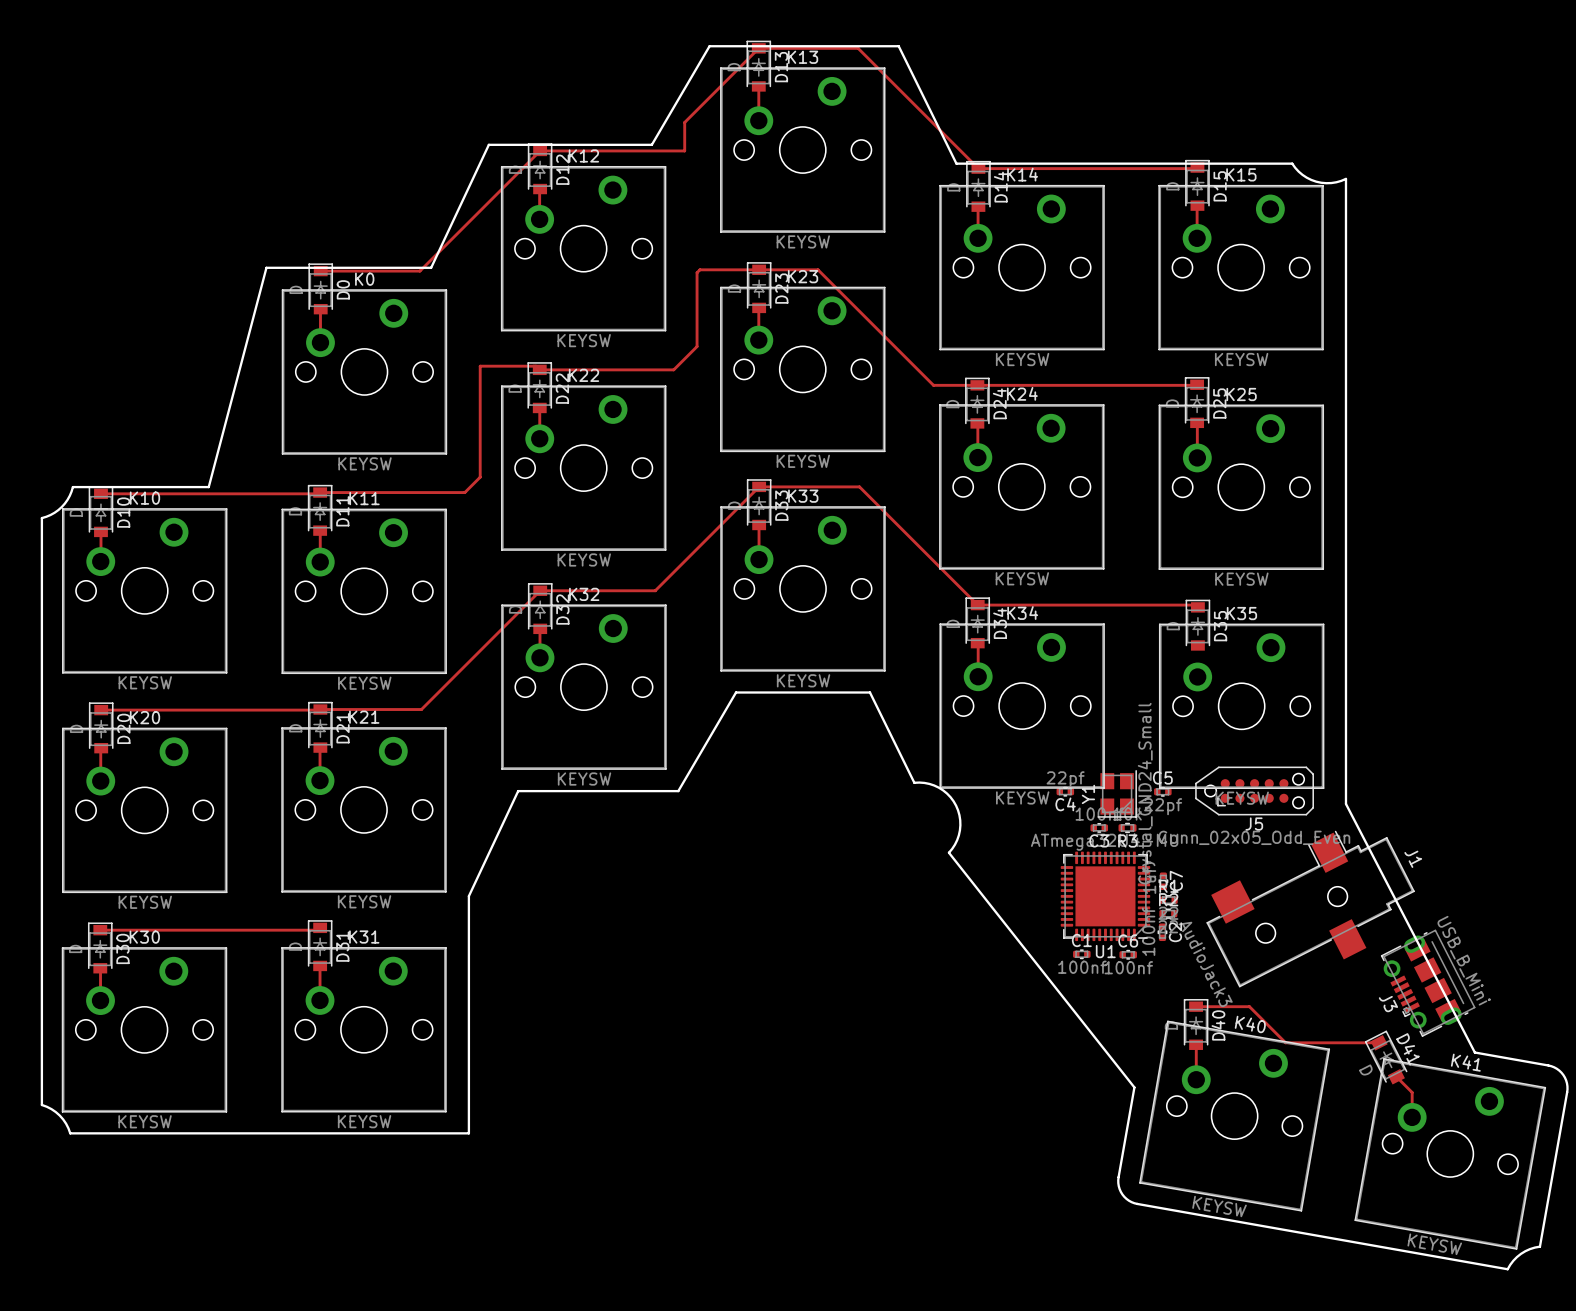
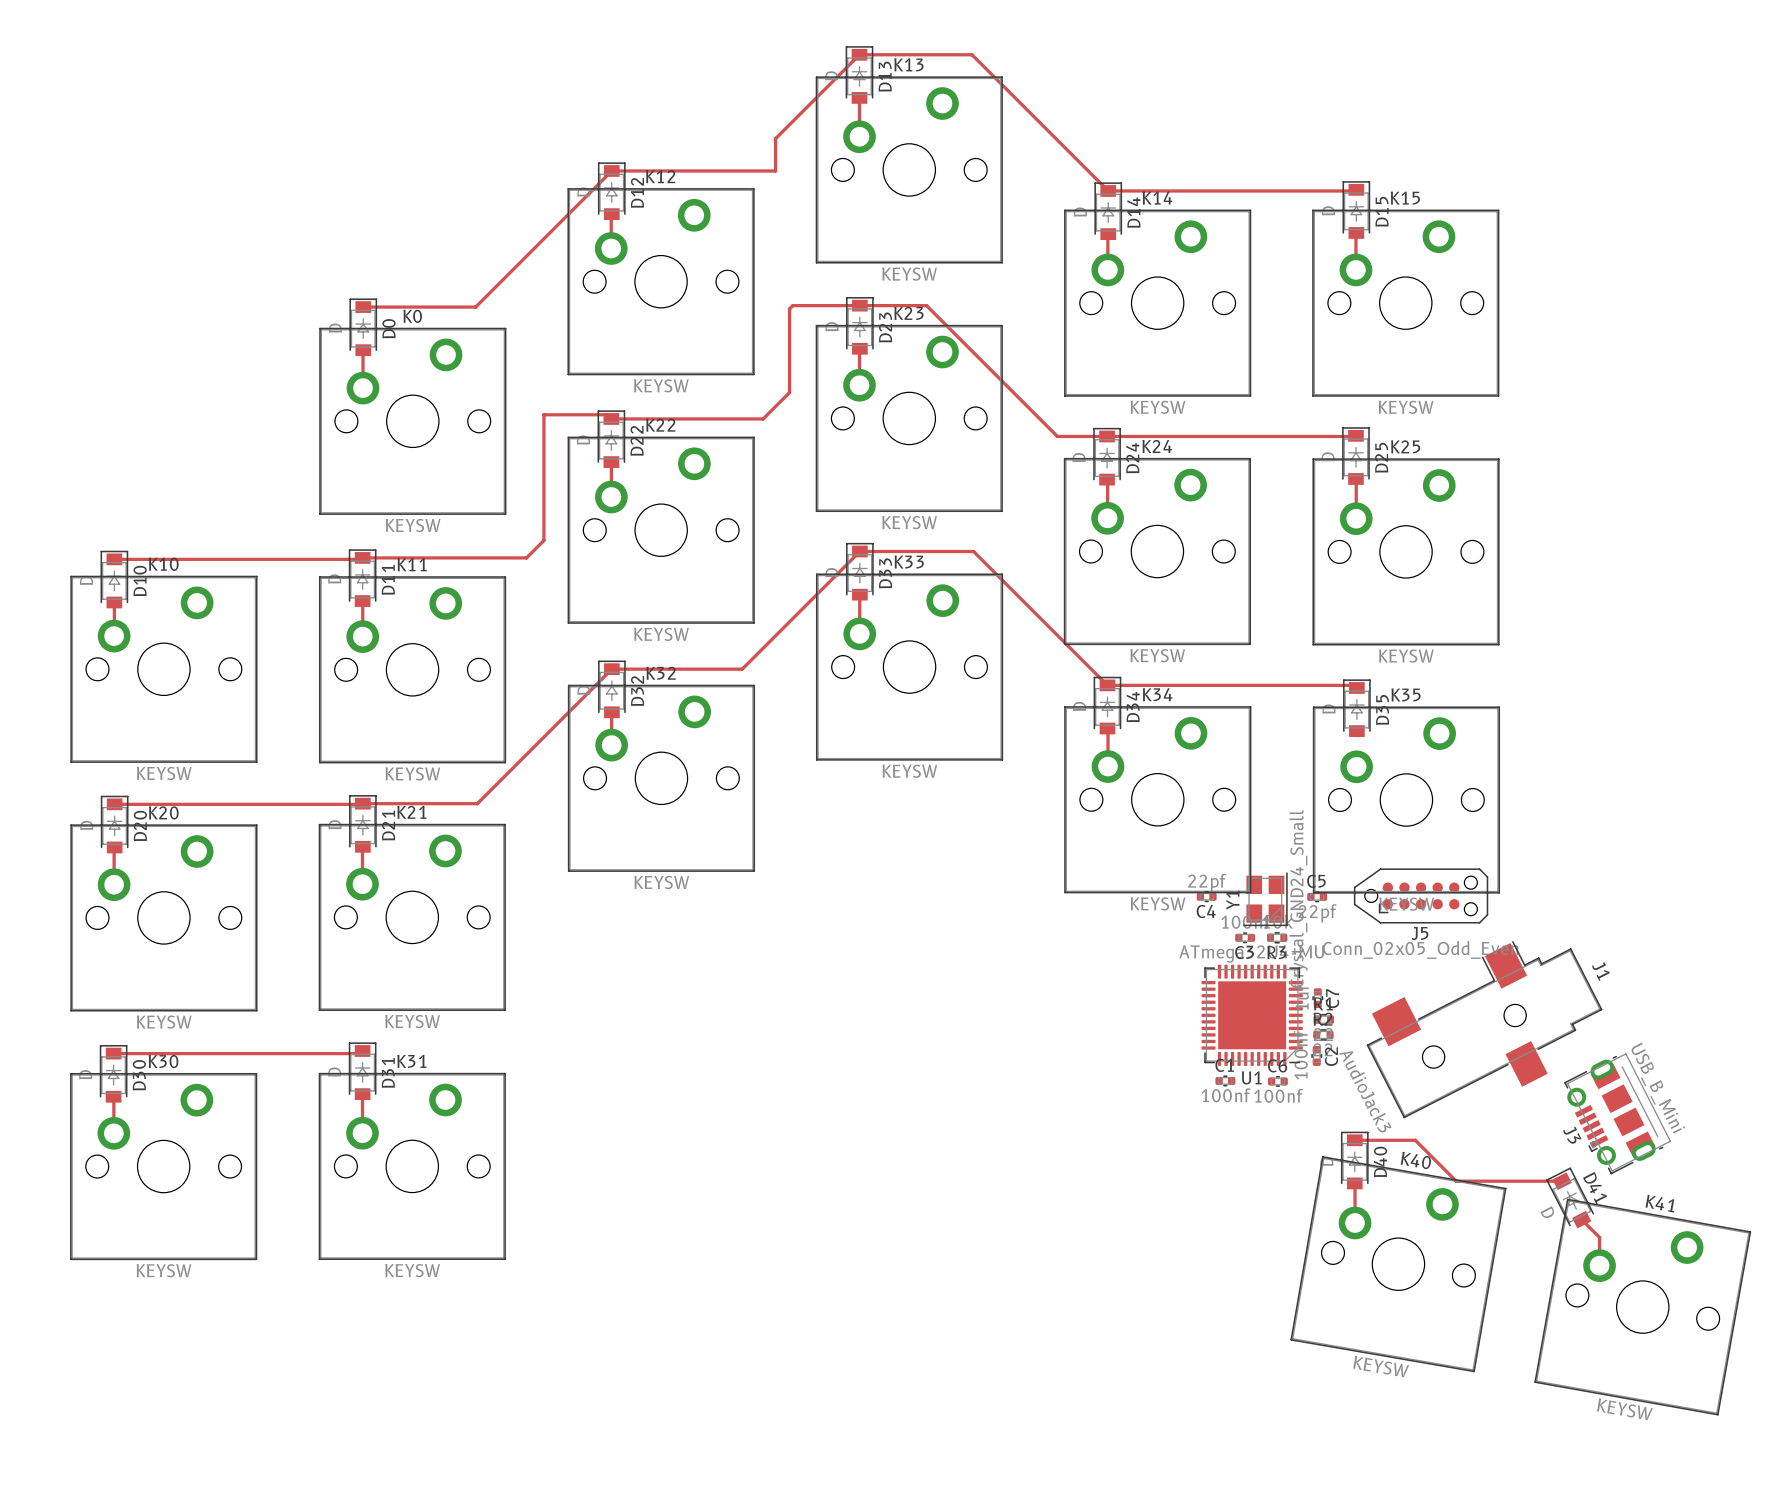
board edge: (709, 46) (651, 144) (488, 144) (431, 267) (266, 267) (208, 487) (72, 487) (67, 499) (61, 507) (54, 512) (41, 518) (41, 1104) (59, 1115) (70, 1133) (468, 1133) (468, 896) (518, 791) (678, 791) (736, 692) (869, 692) (914, 782) (929, 783) (938, 787) (950, 797) (956, 805) (959, 815) (959, 830) (954, 844) (948, 852) (1134, 1087) (1118, 1180) (1119, 1189) (1126, 1198) (1137, 1203) (1507, 1269) (1520, 1253) (1539, 1246) (1567, 1092) (1566, 1080) (1561, 1072) (1551, 1066) (1474, 1052) (1345, 804) (1345, 178) (1331, 183) (1316, 181) (1302, 174) (1292, 163) (956, 163) (898, 46) (709, 46) -> none

